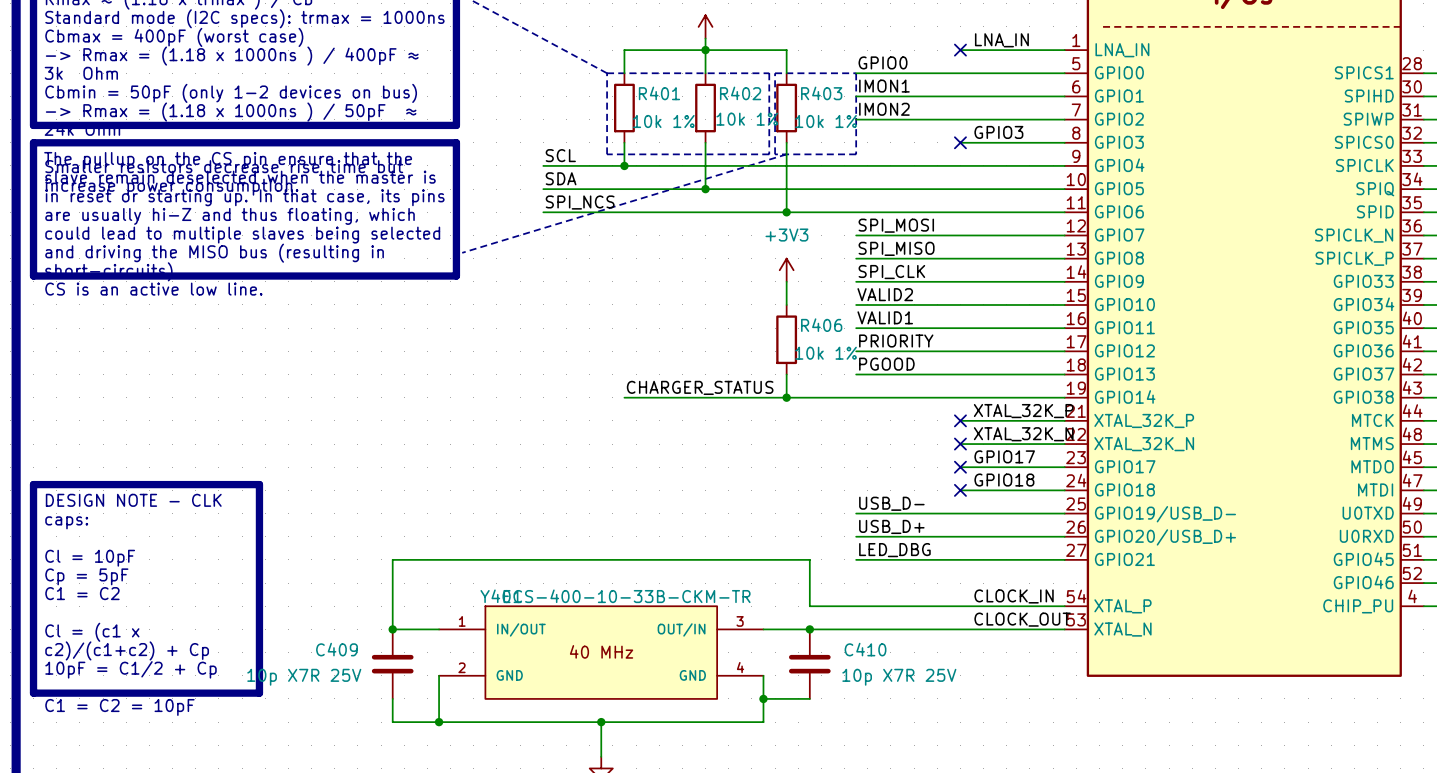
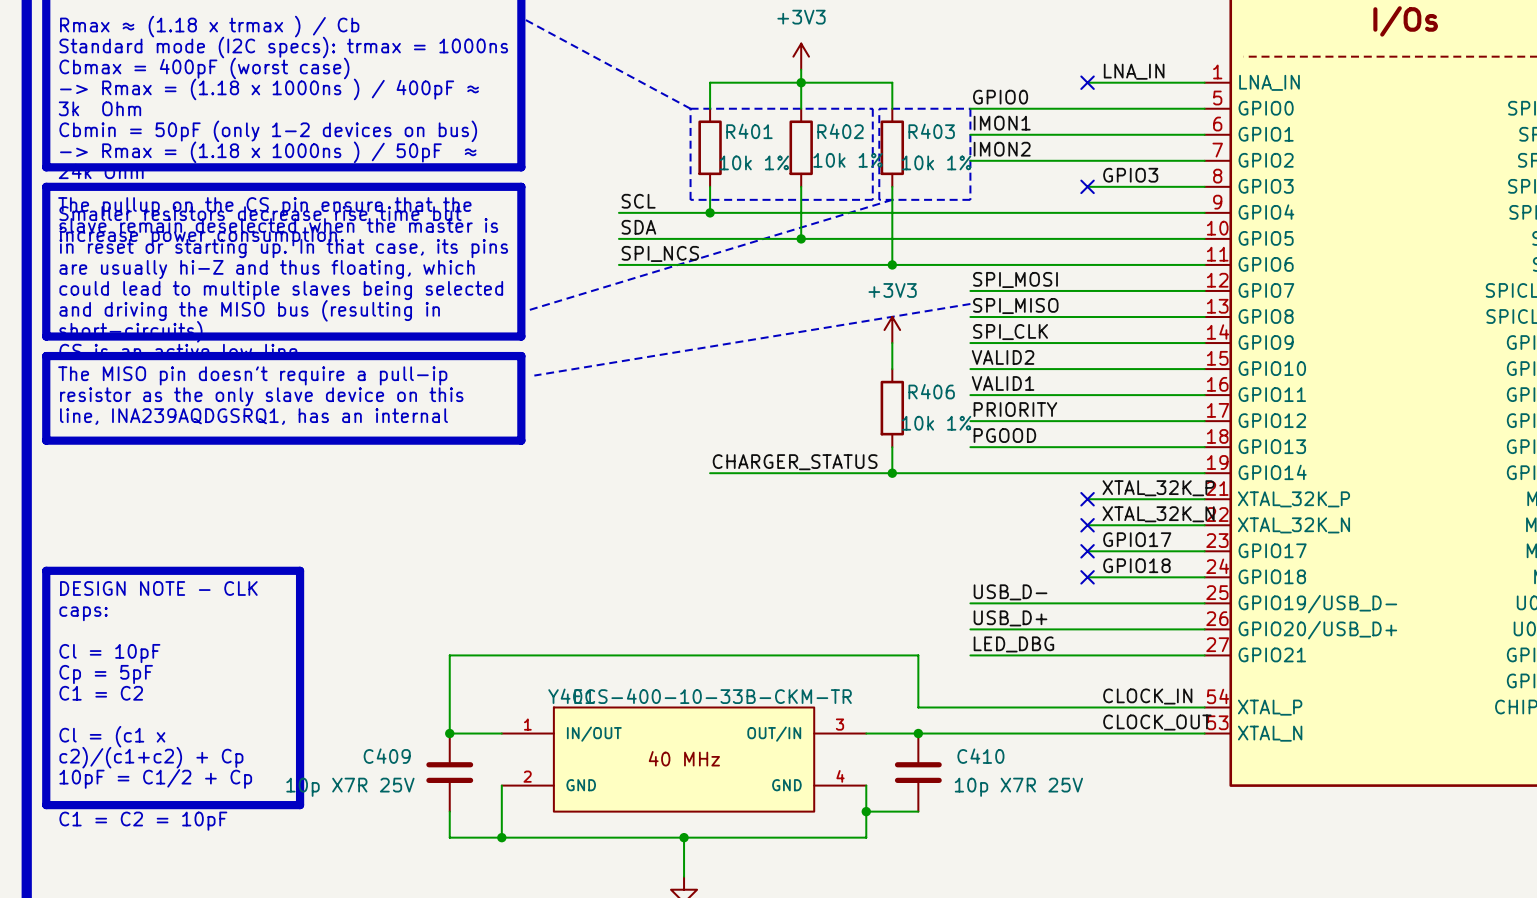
line: none -> (970, 303) (534, 375)
line: none -> (46, 356) (46, 440) (521, 440) (521, 356) (46, 356)
text: none -> The MISO pin doesn't require a pull-ip (252, 375)
text: none -> resistor as the only slave device on this (261, 396)
text: none -> line, INA239AQDGSRQ1, has an internal (253, 416)

